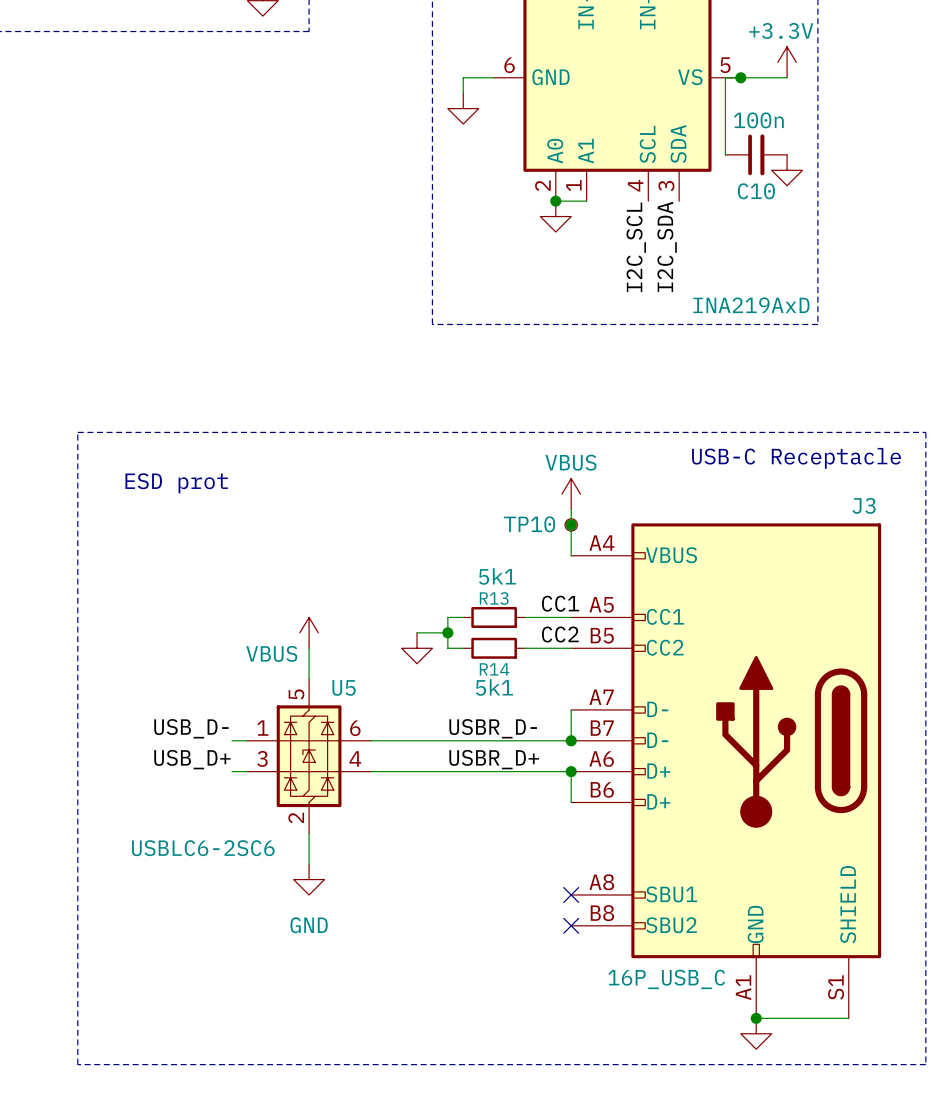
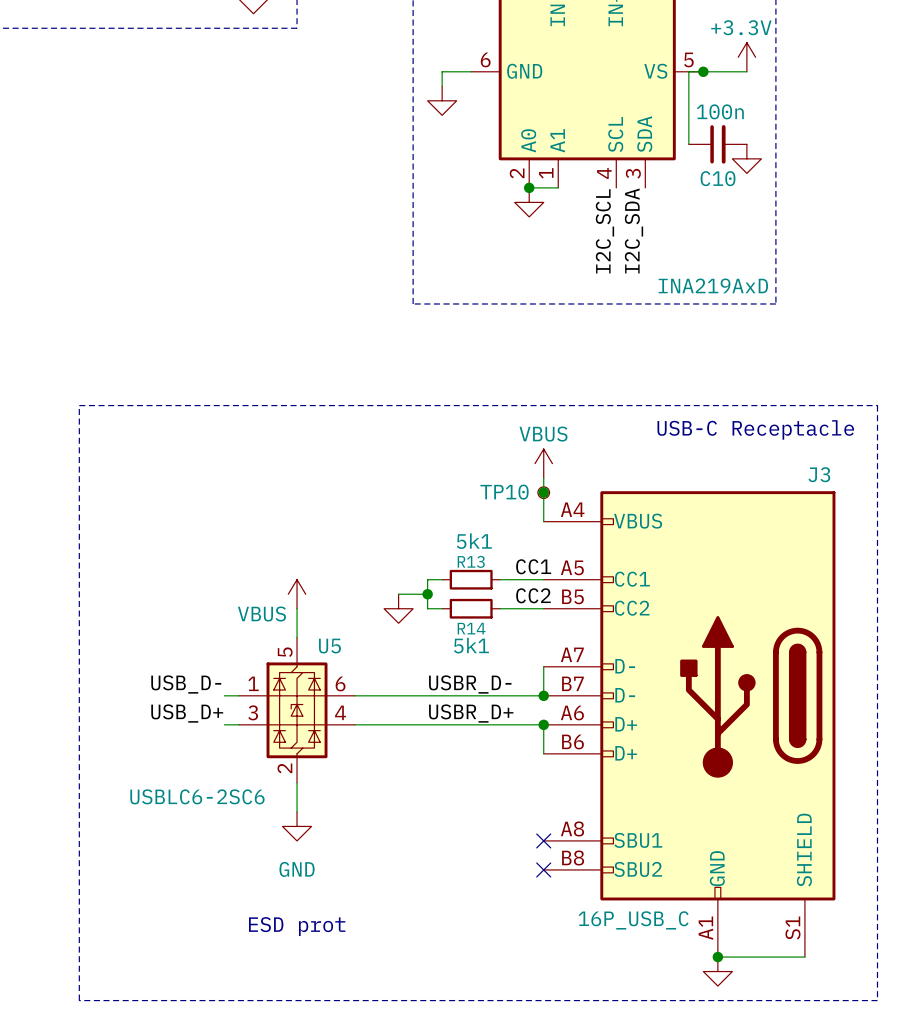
text: ESD prot (176, 483) -> none
text: none -> ESD prot (297, 926)

